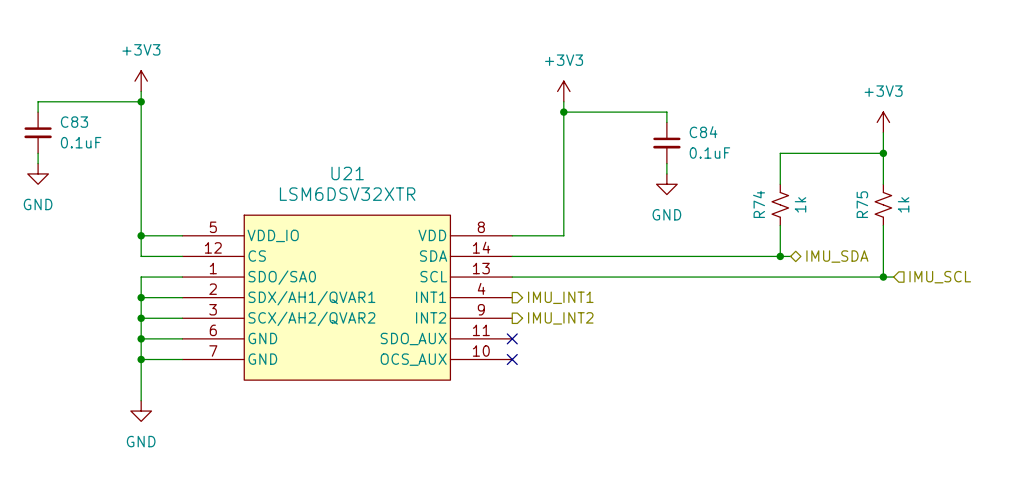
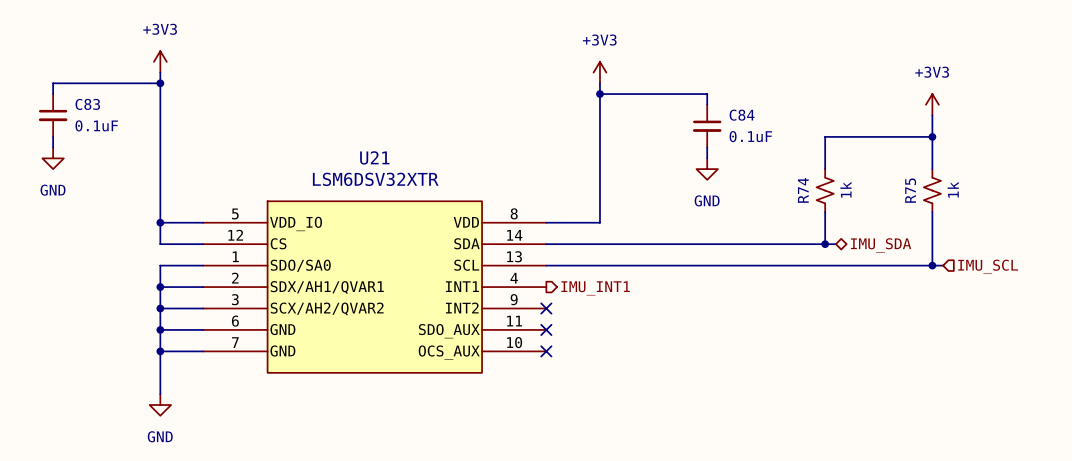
no-connect mark: none -> (546, 308)
hierarchical label: IMU_INT2 (560, 318) -> none

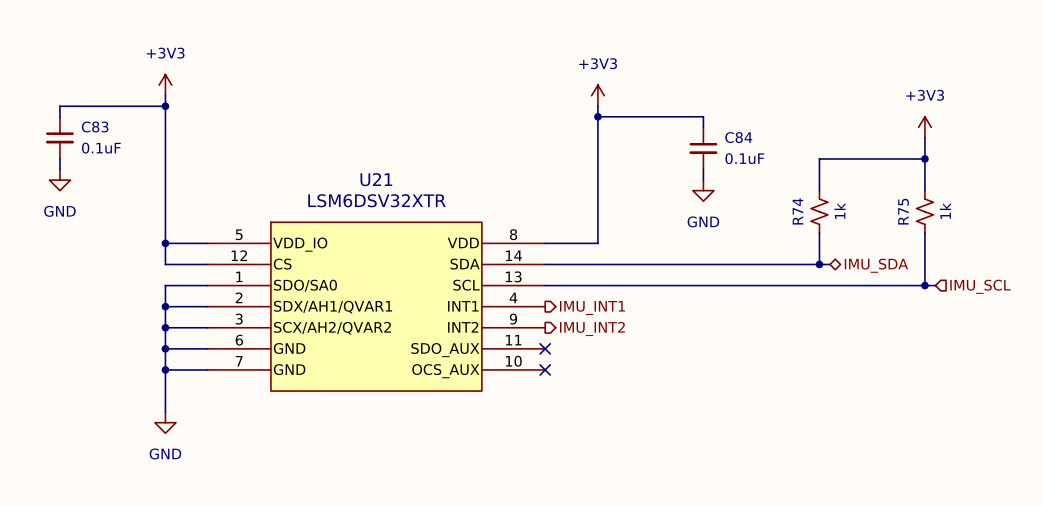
no-connect mark: (546, 308) -> none
hierarchical label: none -> IMU_INT2 (592, 328)

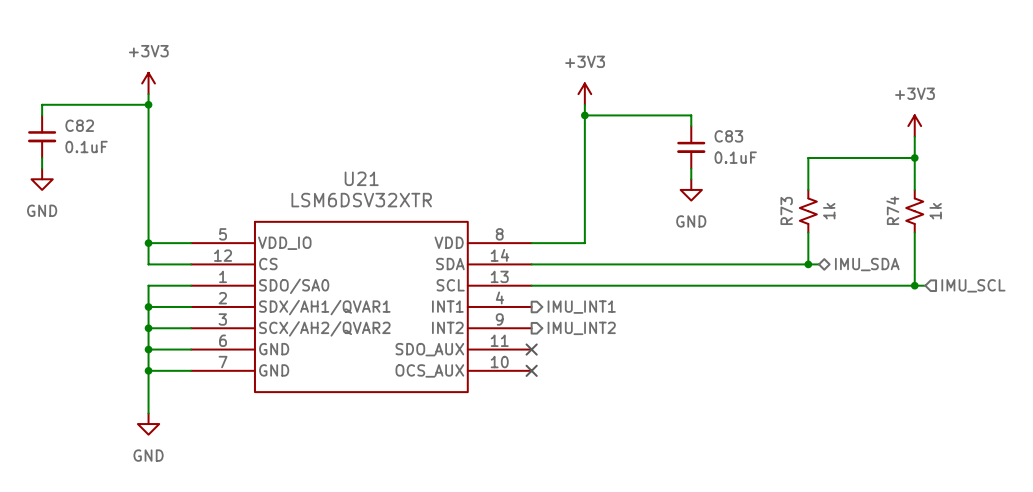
C83 name: C83 (95, 127) -> C82 (79, 125)
C84 name: C84 (738, 137) -> C83 (728, 136)
R74 name: R74 (797, 211) -> R73 (786, 210)
R75 name: R75 (903, 211) -> R74 (892, 210)

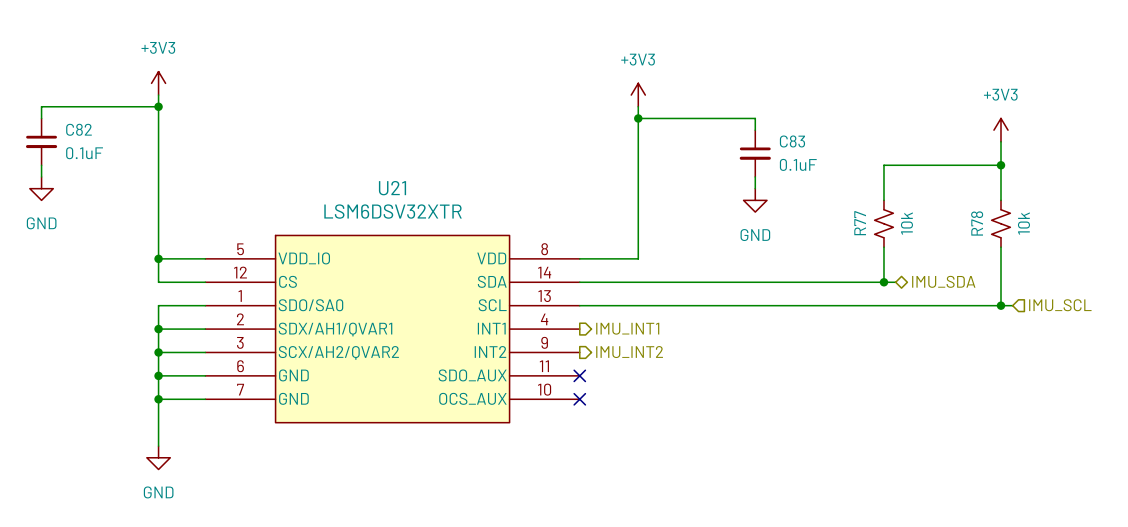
R73 name: R73 (786, 210) -> R77 (860, 223)
R74 name: R74 (892, 210) -> R78 (977, 223)
R73 value: 1k (829, 211) -> 10k (906, 223)
R74 value: 1k (935, 211) -> 10k (1023, 223)

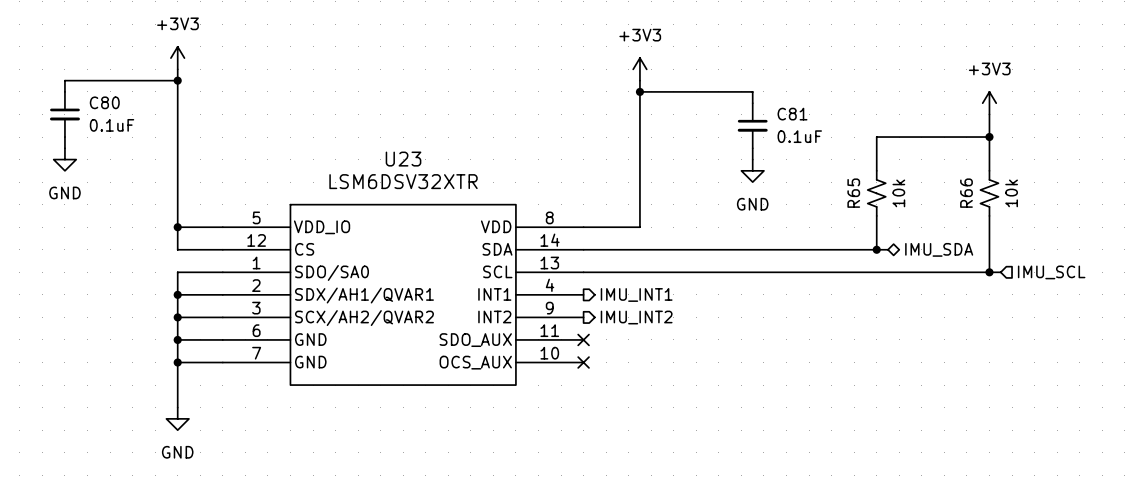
C82 name: C82 (78, 129) -> C80 (104, 102)
C83 name: C83 (792, 141) -> C81 (792, 114)
U21 name: U21 (392, 188) -> U23 (403, 159)
R77 name: R77 (860, 223) -> R65 (853, 193)
R78 name: R78 (977, 223) -> R66 (966, 193)

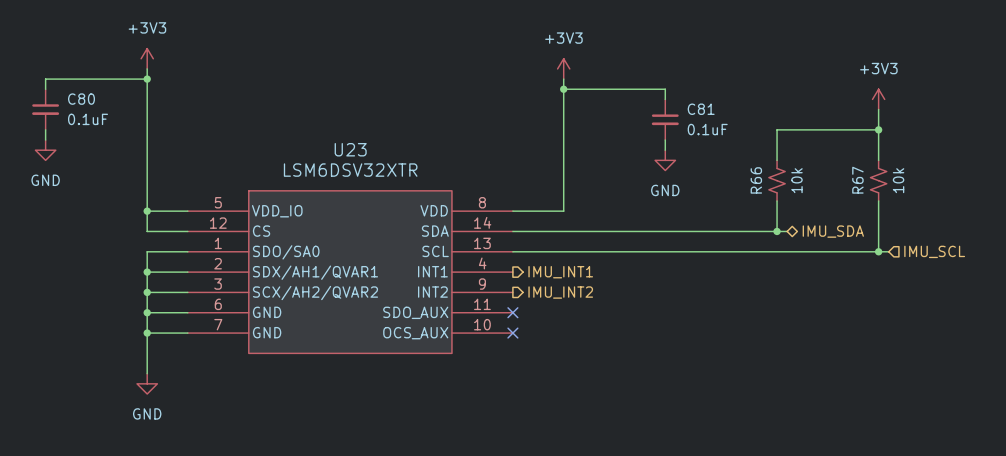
R65 name: R65 (853, 193) -> R66 (756, 180)
R66 name: R66 (966, 193) -> R67 (857, 180)

